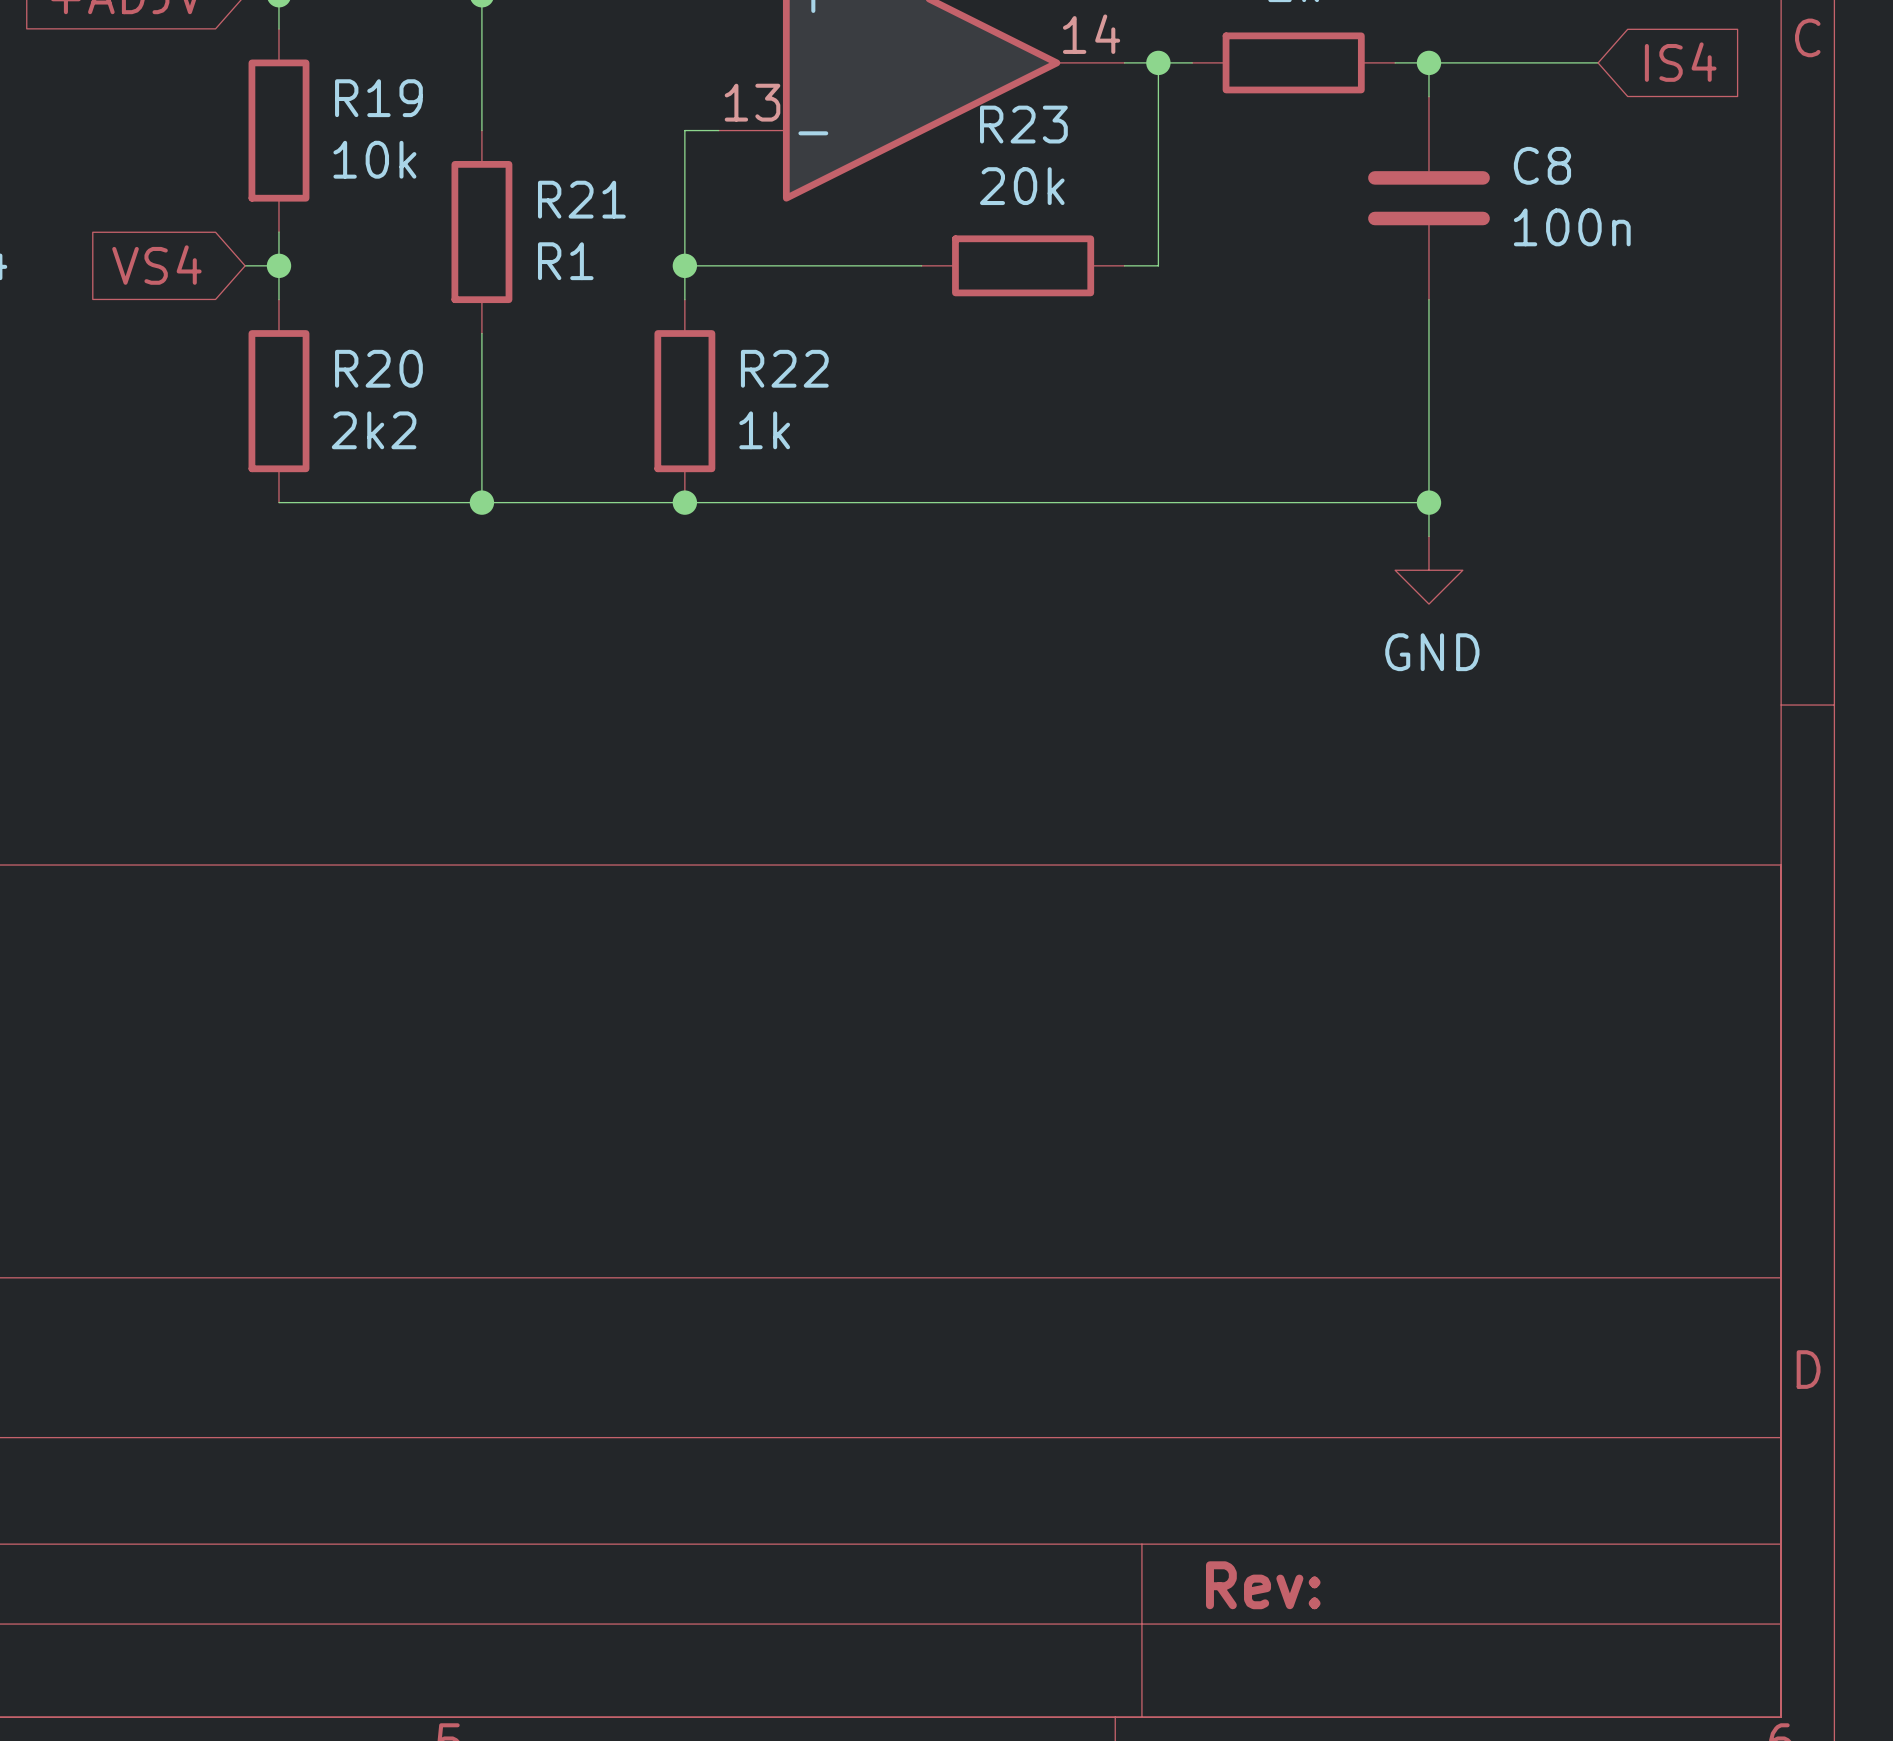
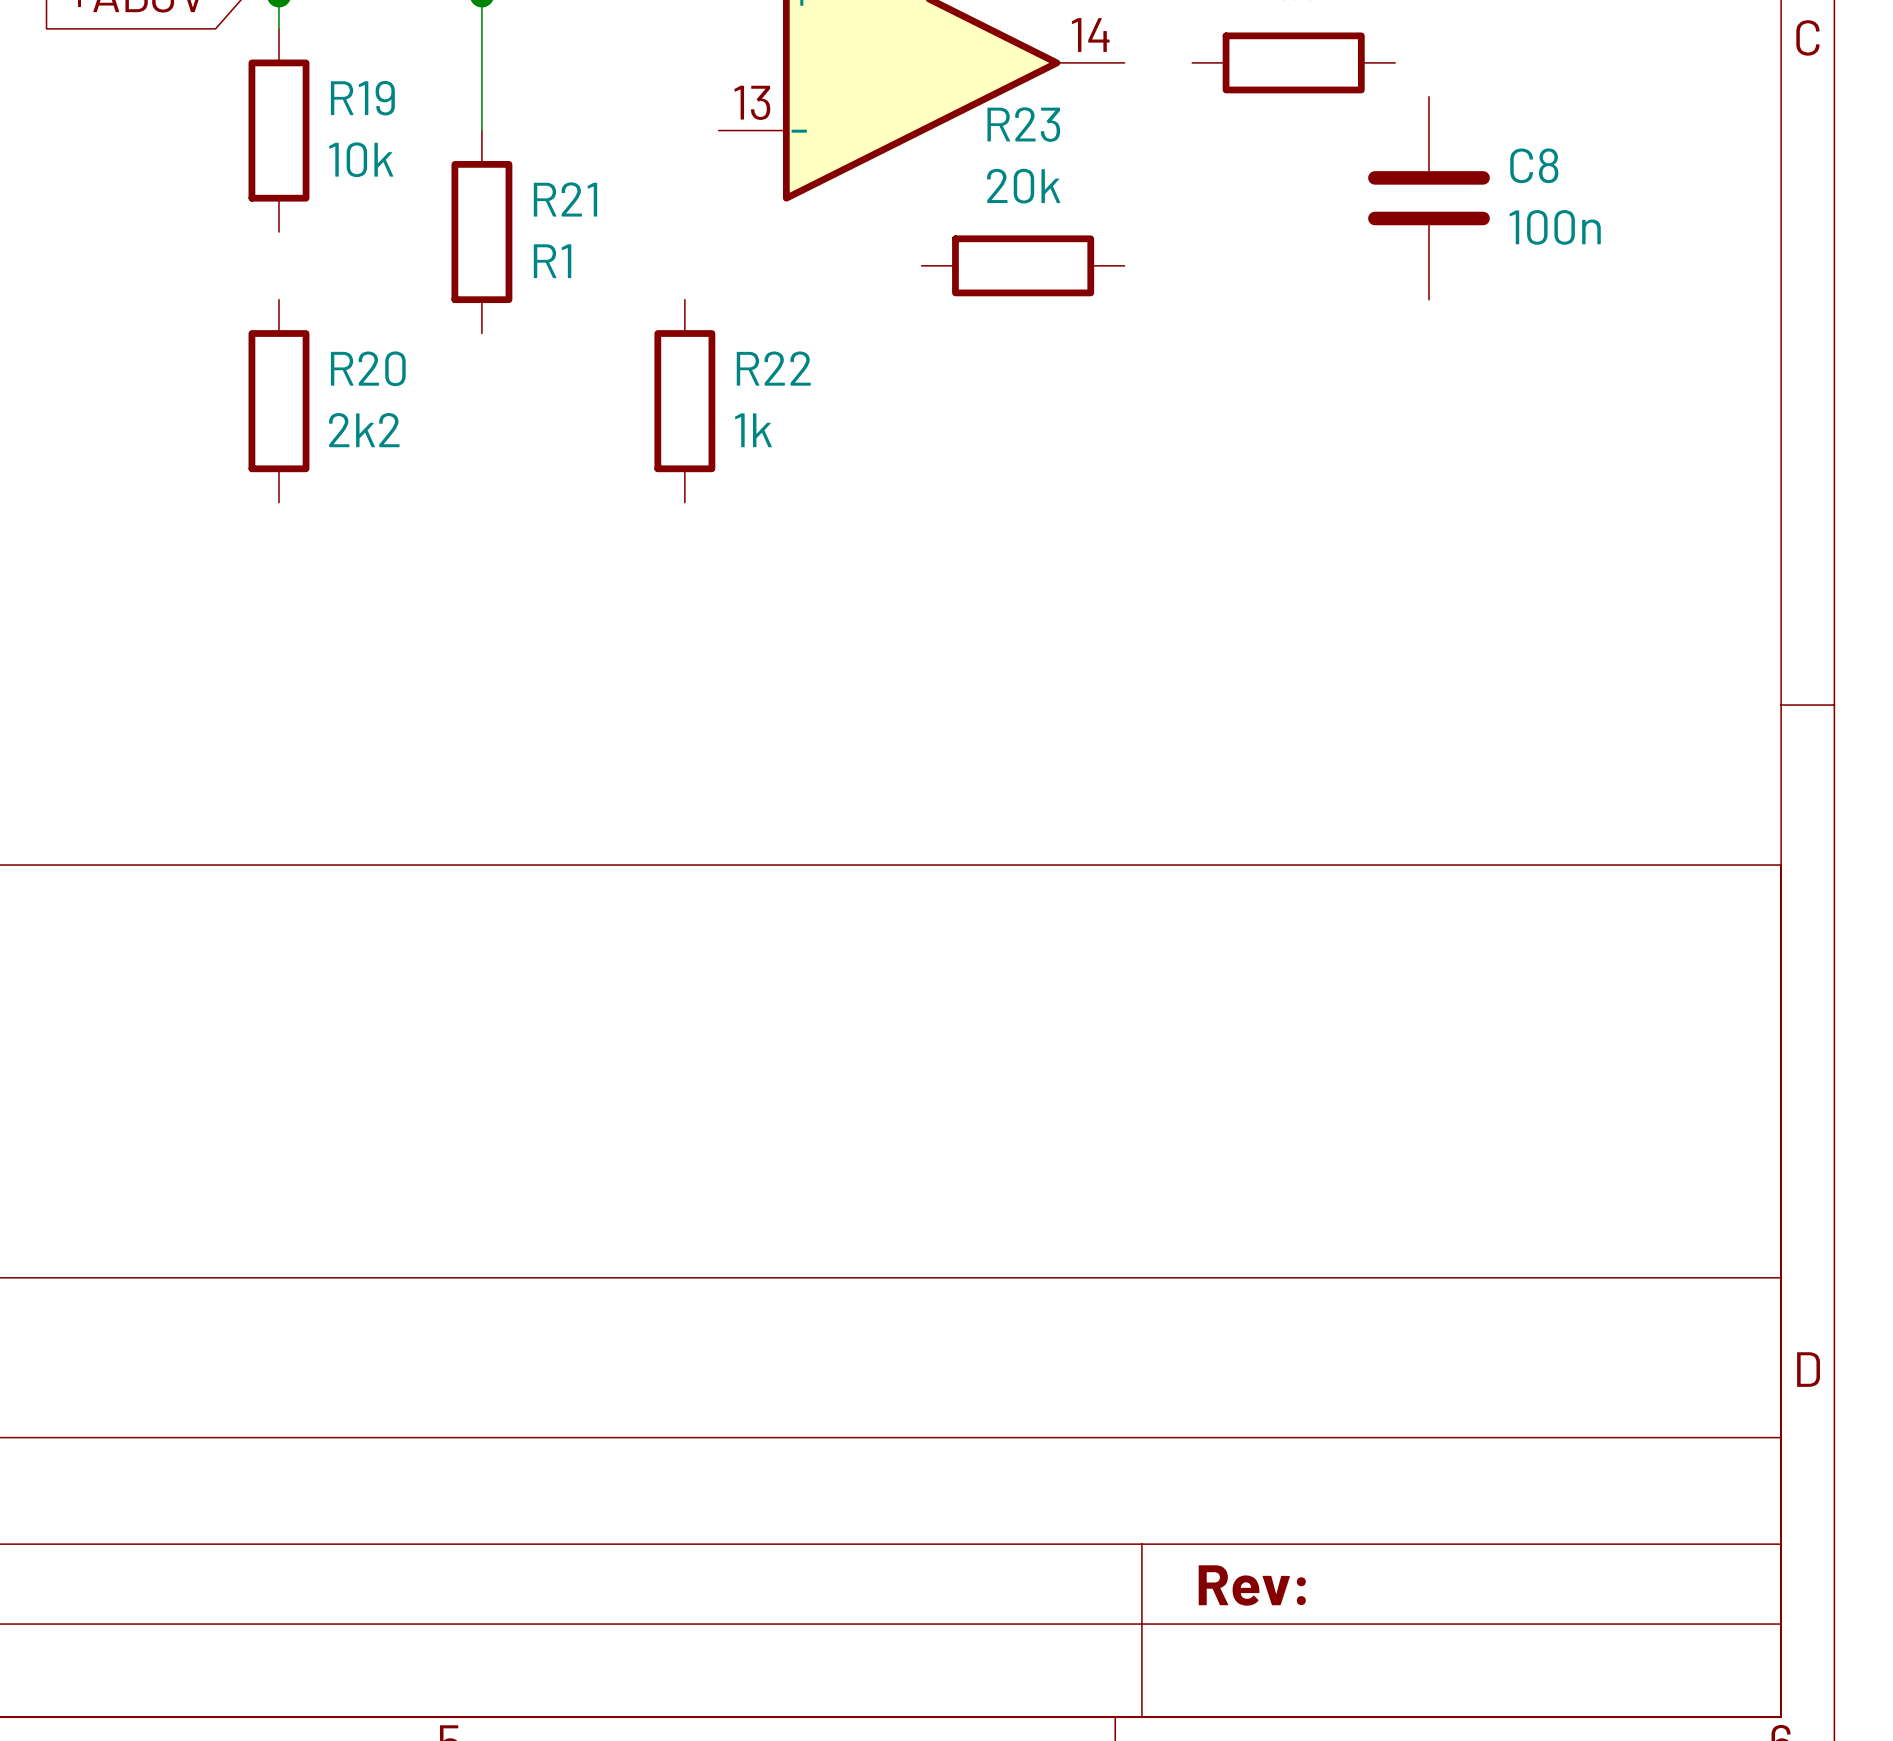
wire: (1124, 62) (1192, 62) -> none
wire: (1158, 62) (1158, 265) (1124, 265) -> none
junction: (1158, 62) -> none
wire: (1395, 62) (1598, 62) -> none
wire: (1428, 62) (1428, 96) -> none
junction: (1428, 62) -> none
global label: IS4 (1680, 62) -> none
wire: (718, 130) (684, 130) (684, 299) -> none
wire: (278, 232) (278, 299) -> none
global label: VS4 (156, 265) -> none
wire: (245, 265) (278, 265) -> none
junction: (278, 265) -> none
wire: (684, 265) (921, 265) -> none
junction: (684, 265) -> none
wire: (1428, 299) (1428, 536) -> none
wire: (481, 333) (481, 502) -> none
wire: (278, 502) (1428, 502) -> none
junction: (481, 502) -> none
junction: (684, 502) -> none
junction: (1428, 502) -> none
power symbol: GND (1428, 570) -> none

